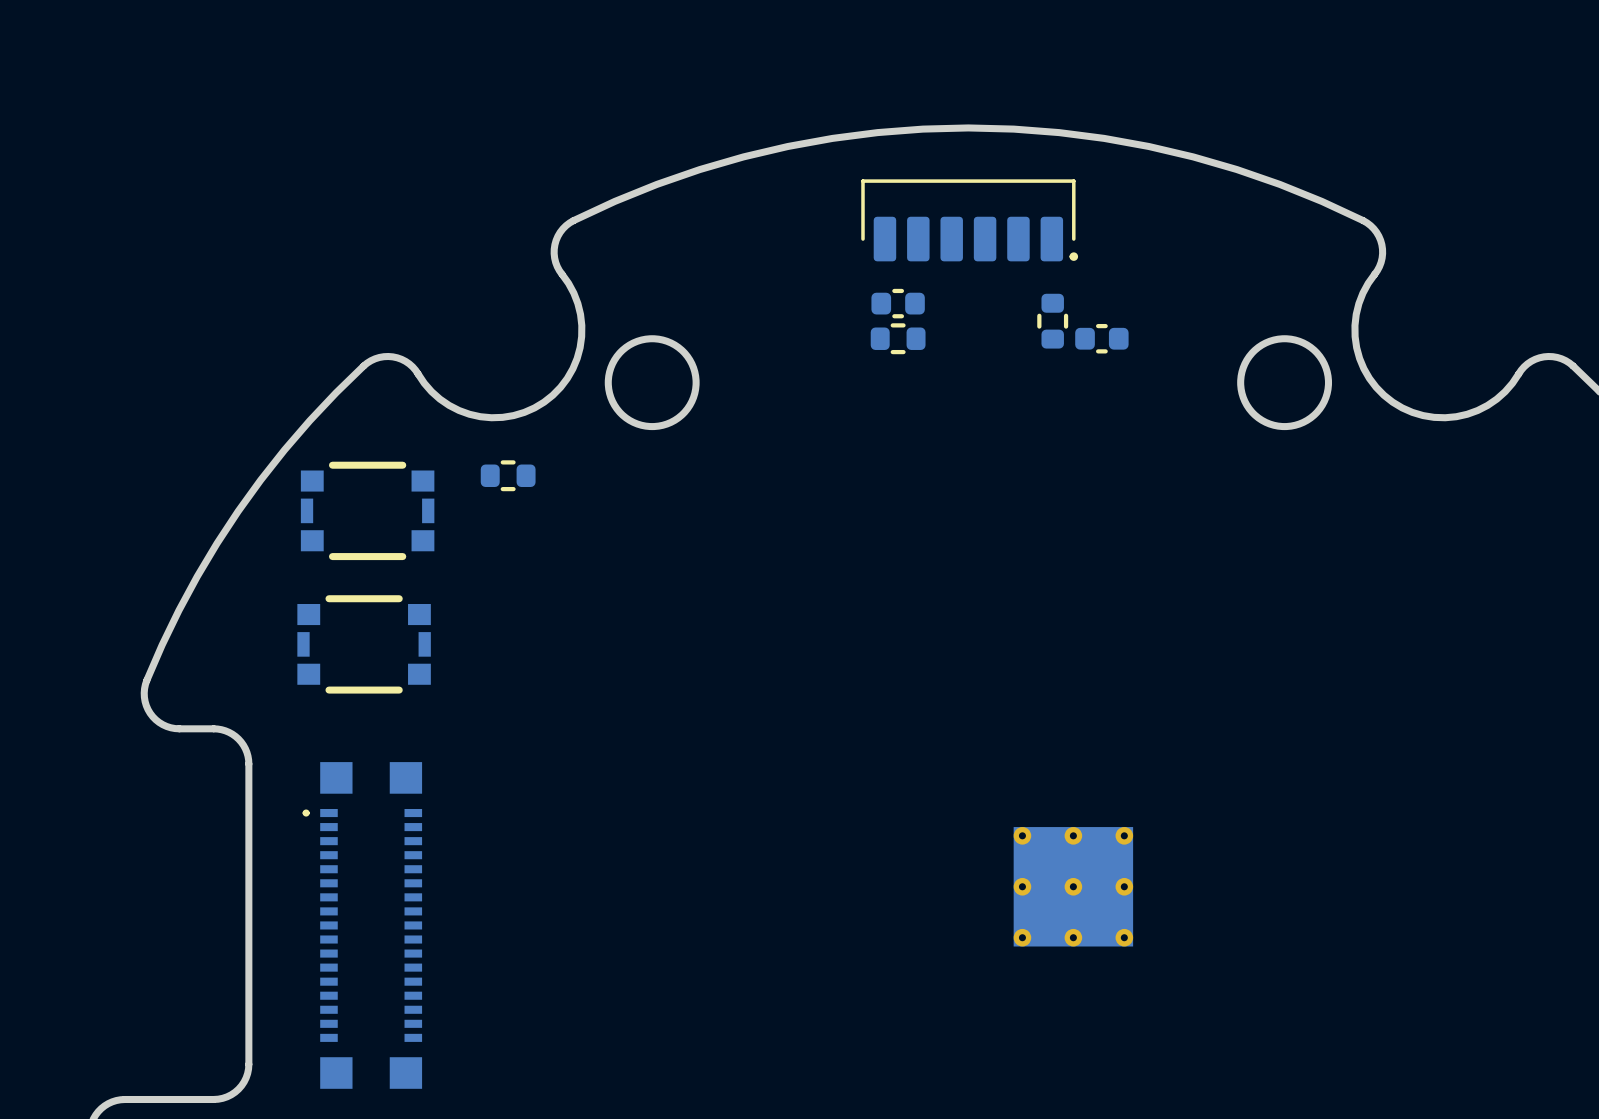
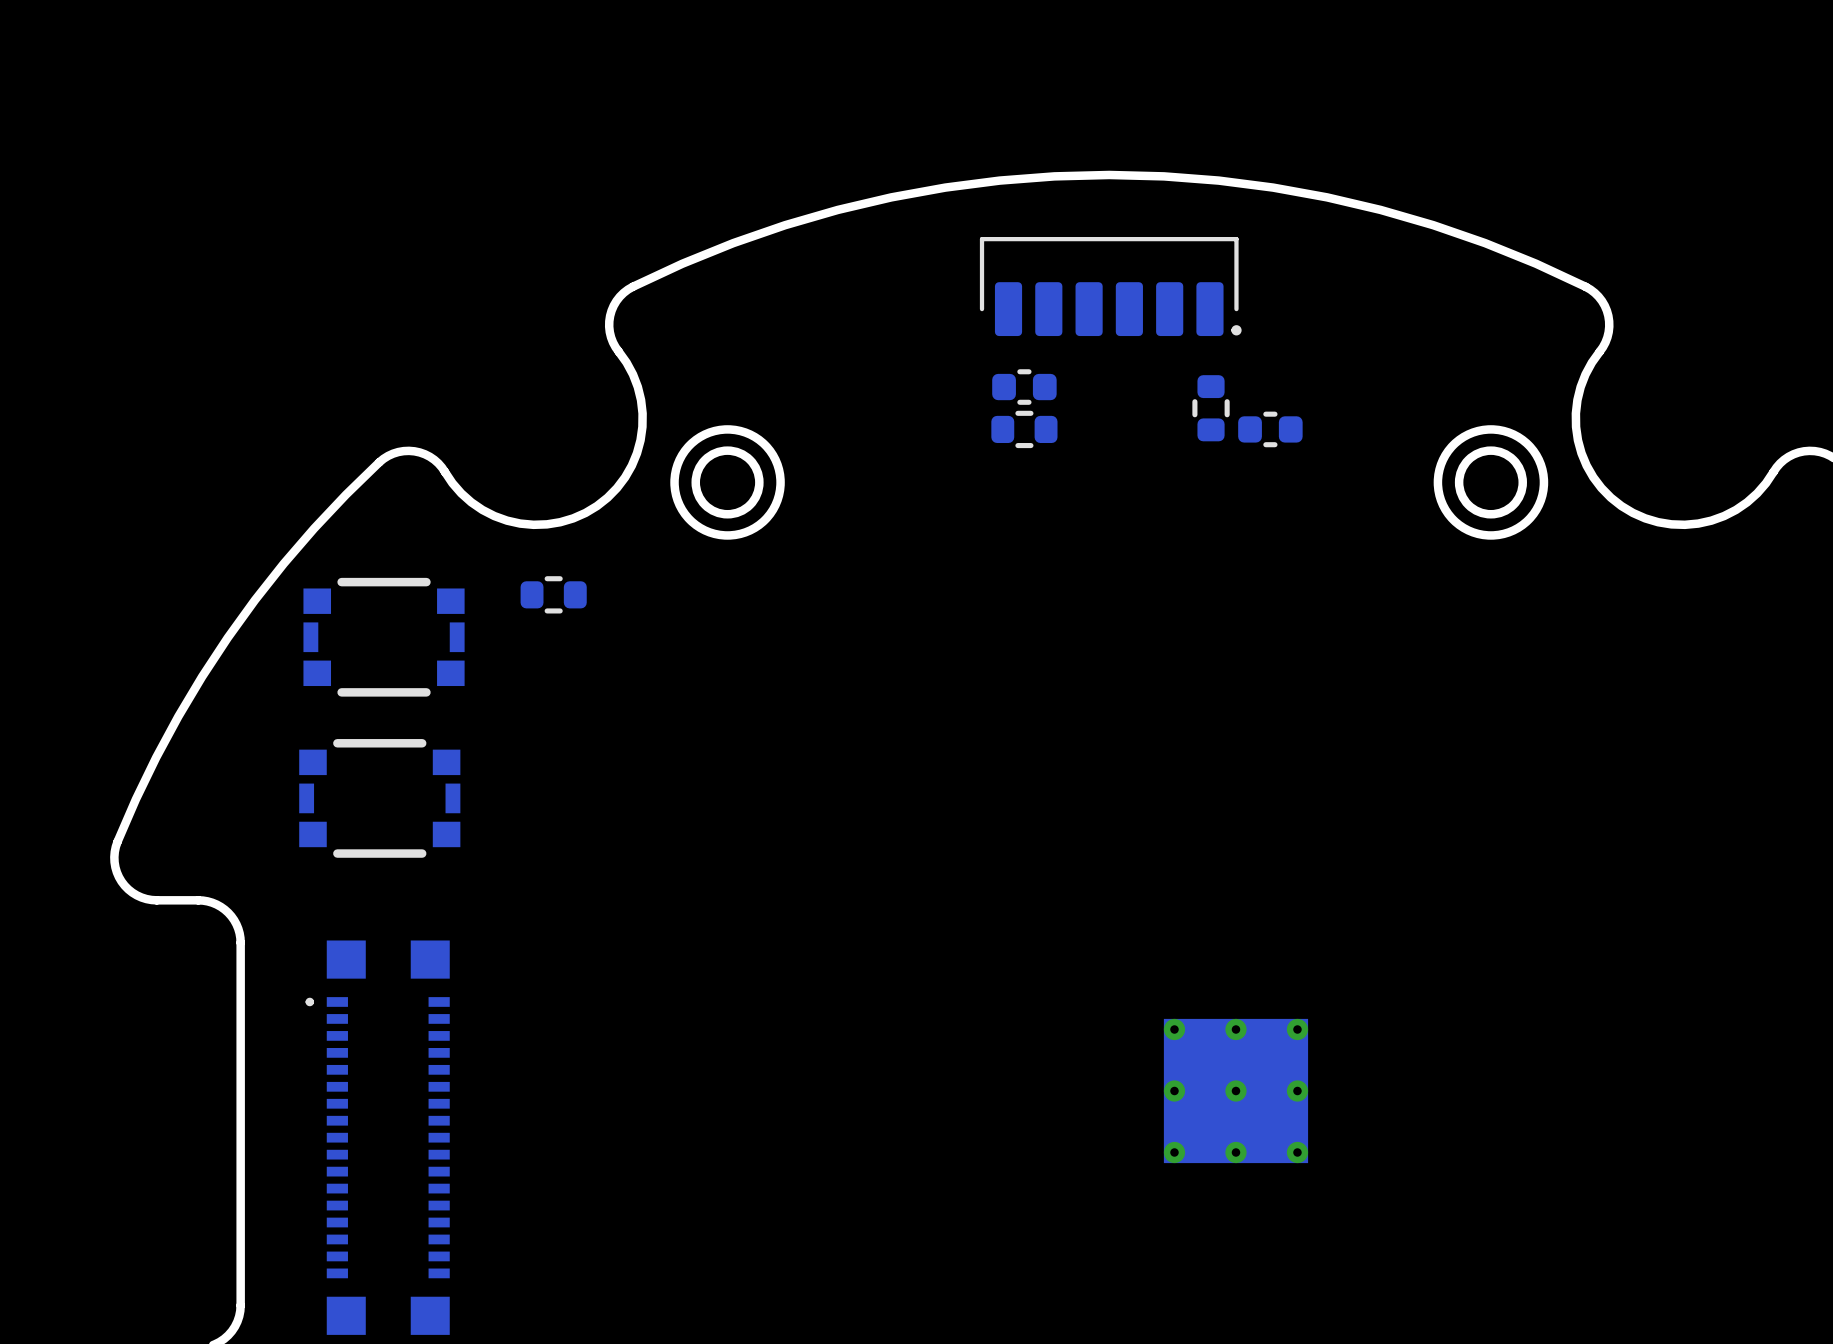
round board edge: none -> [691, 446, 764, 519]
round board edge: none -> [1454, 446, 1527, 519]

